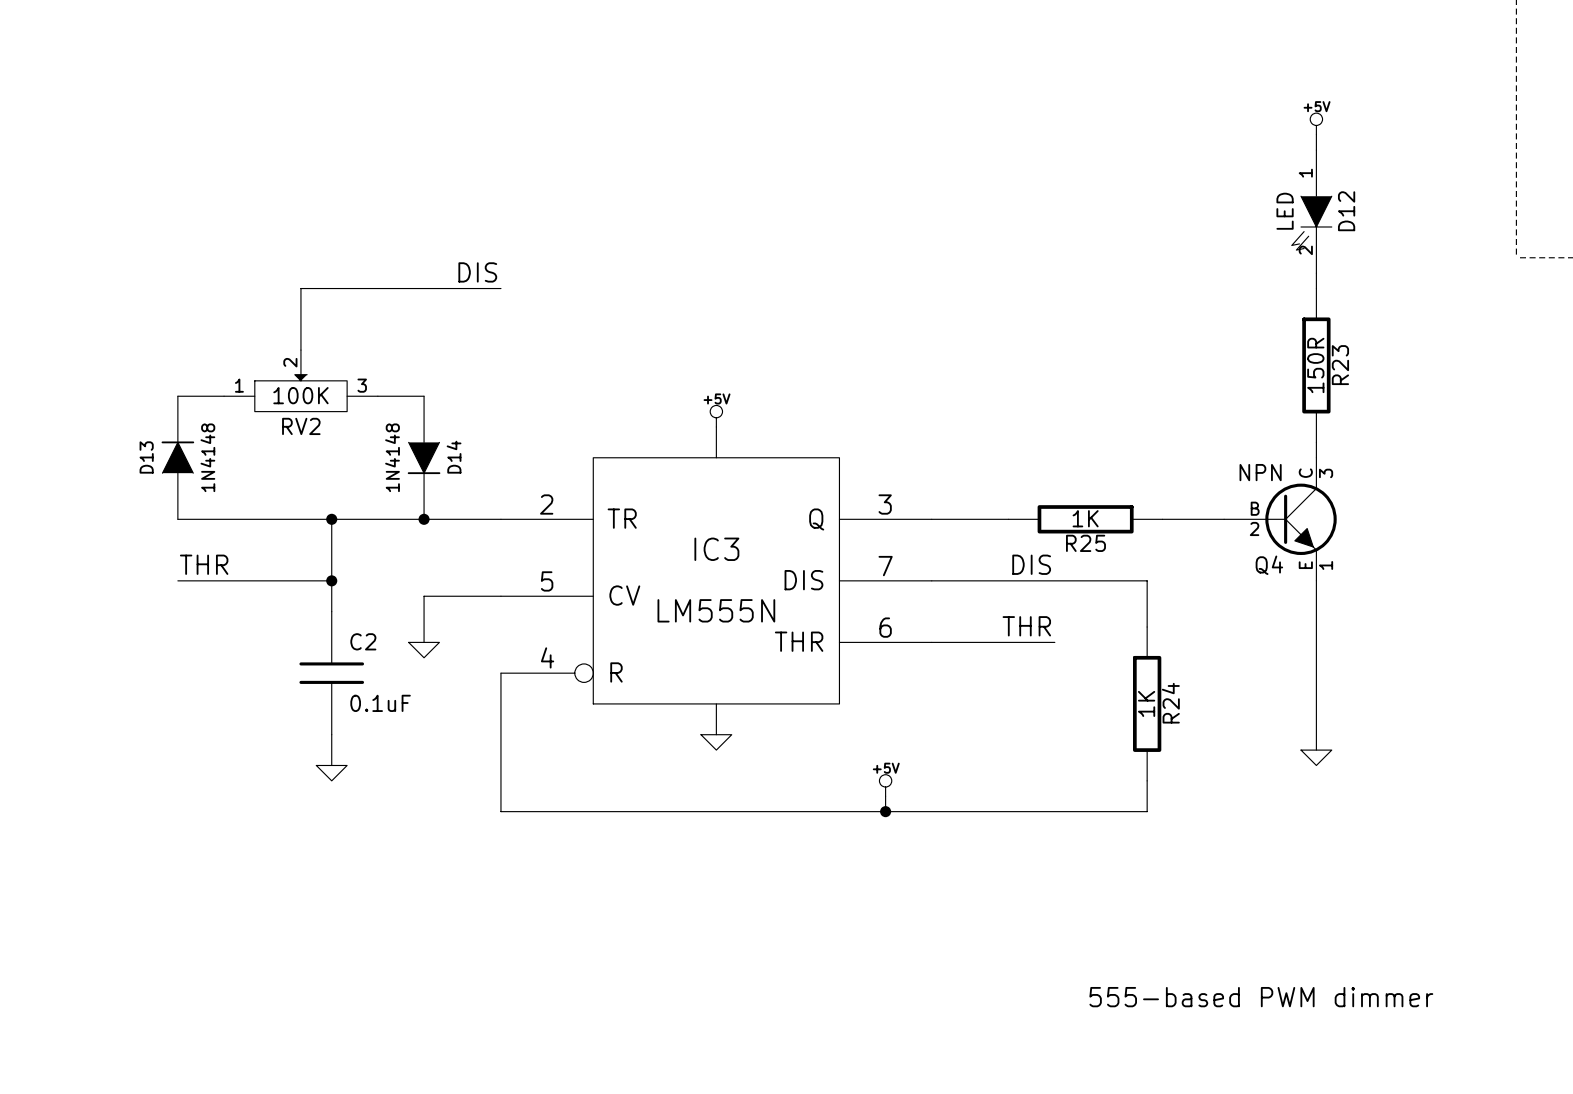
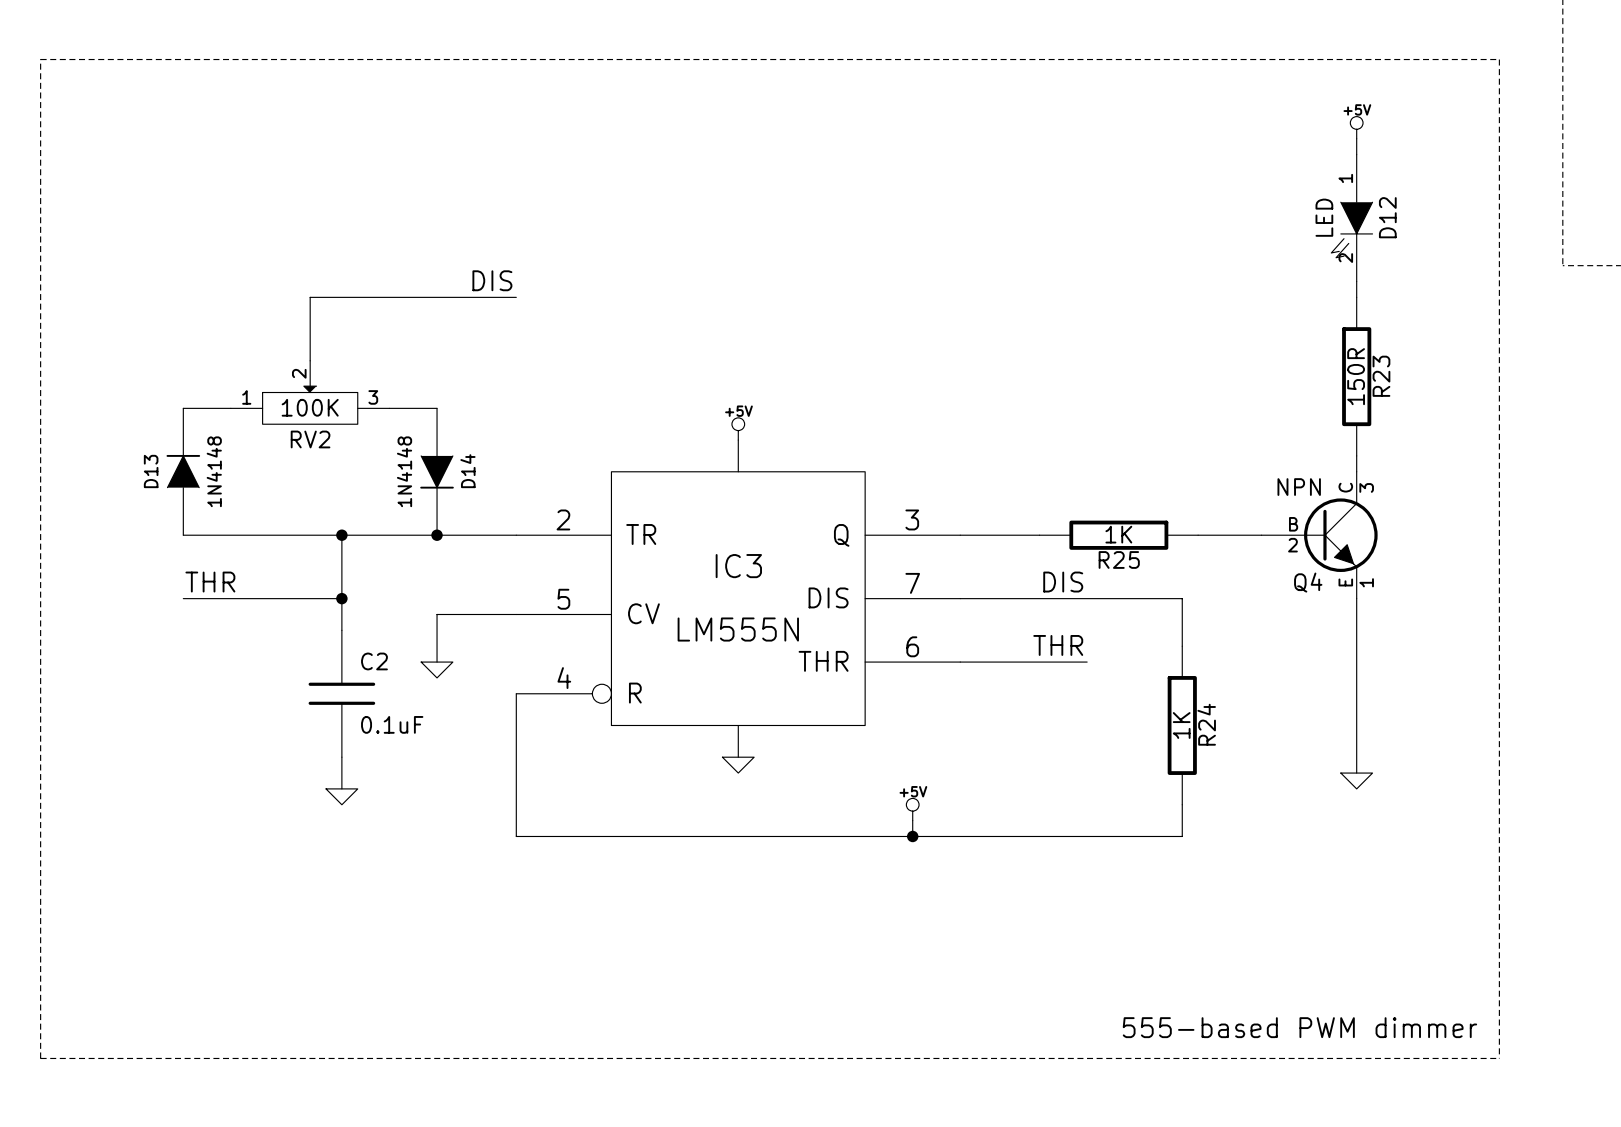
line: none -> (40, 59) (40, 1058) (1499, 1058) (1499, 59) (40, 59)

